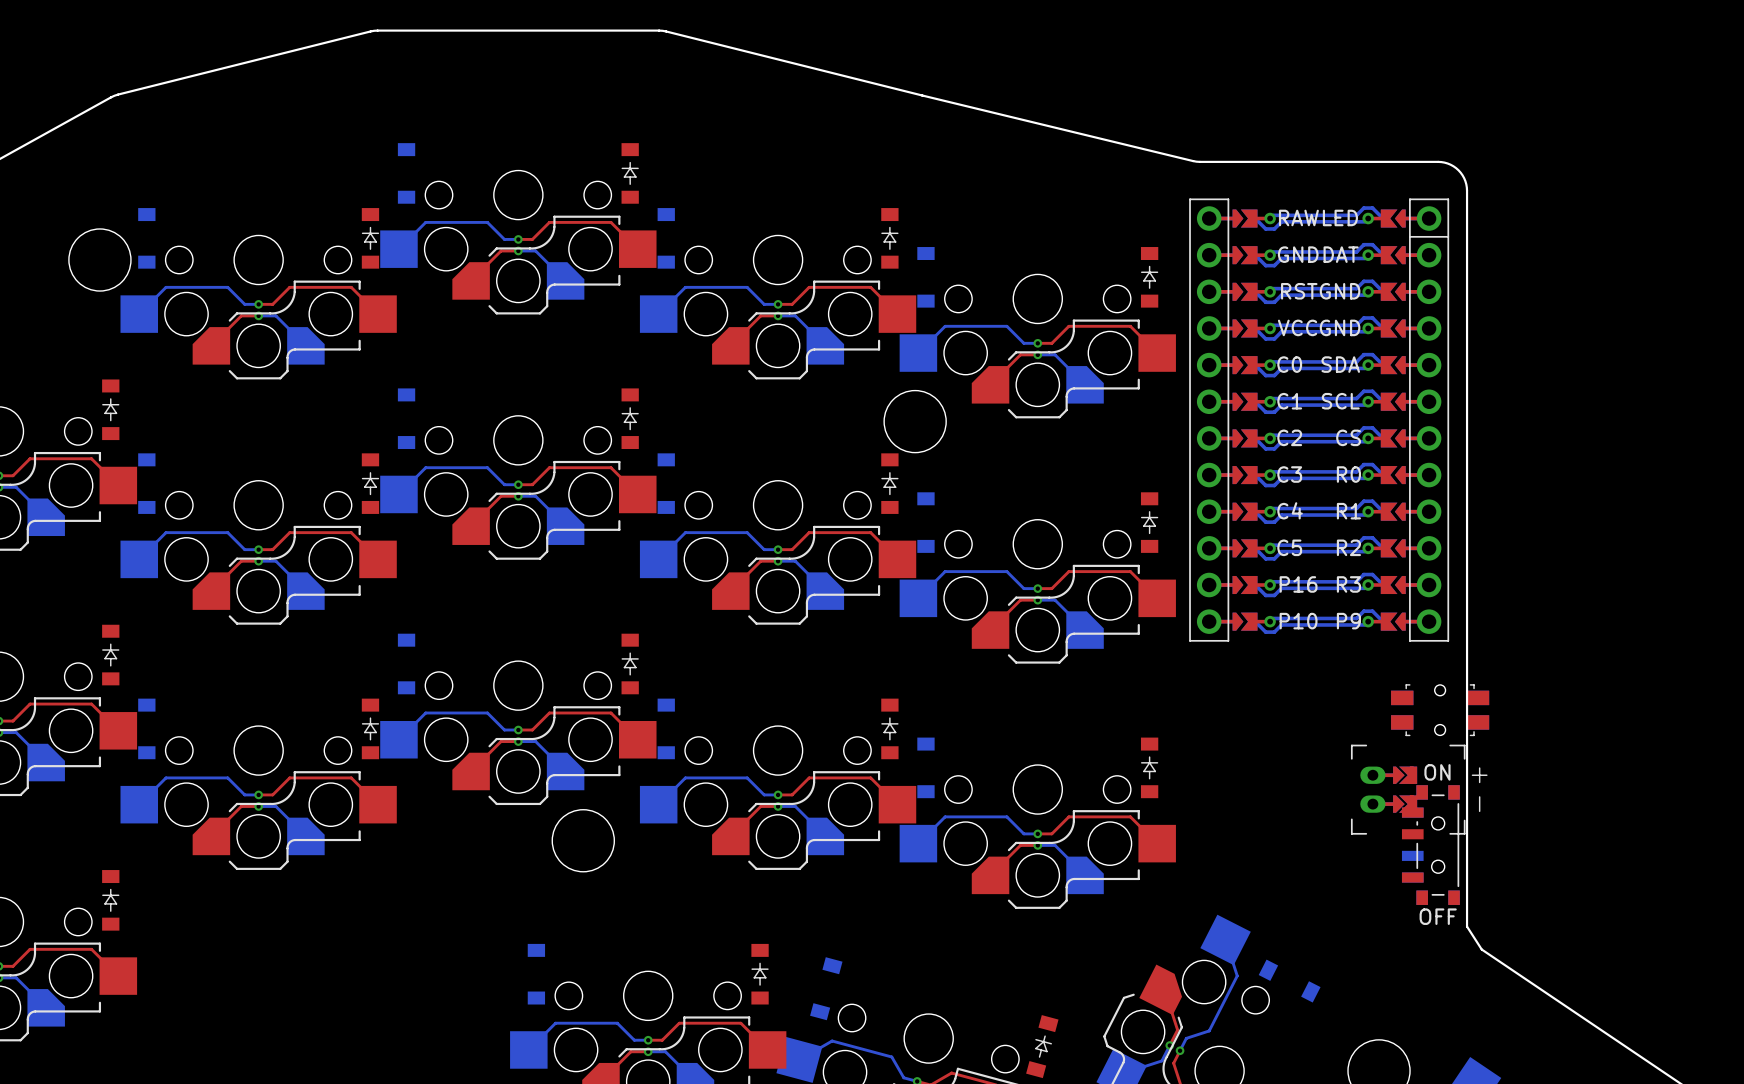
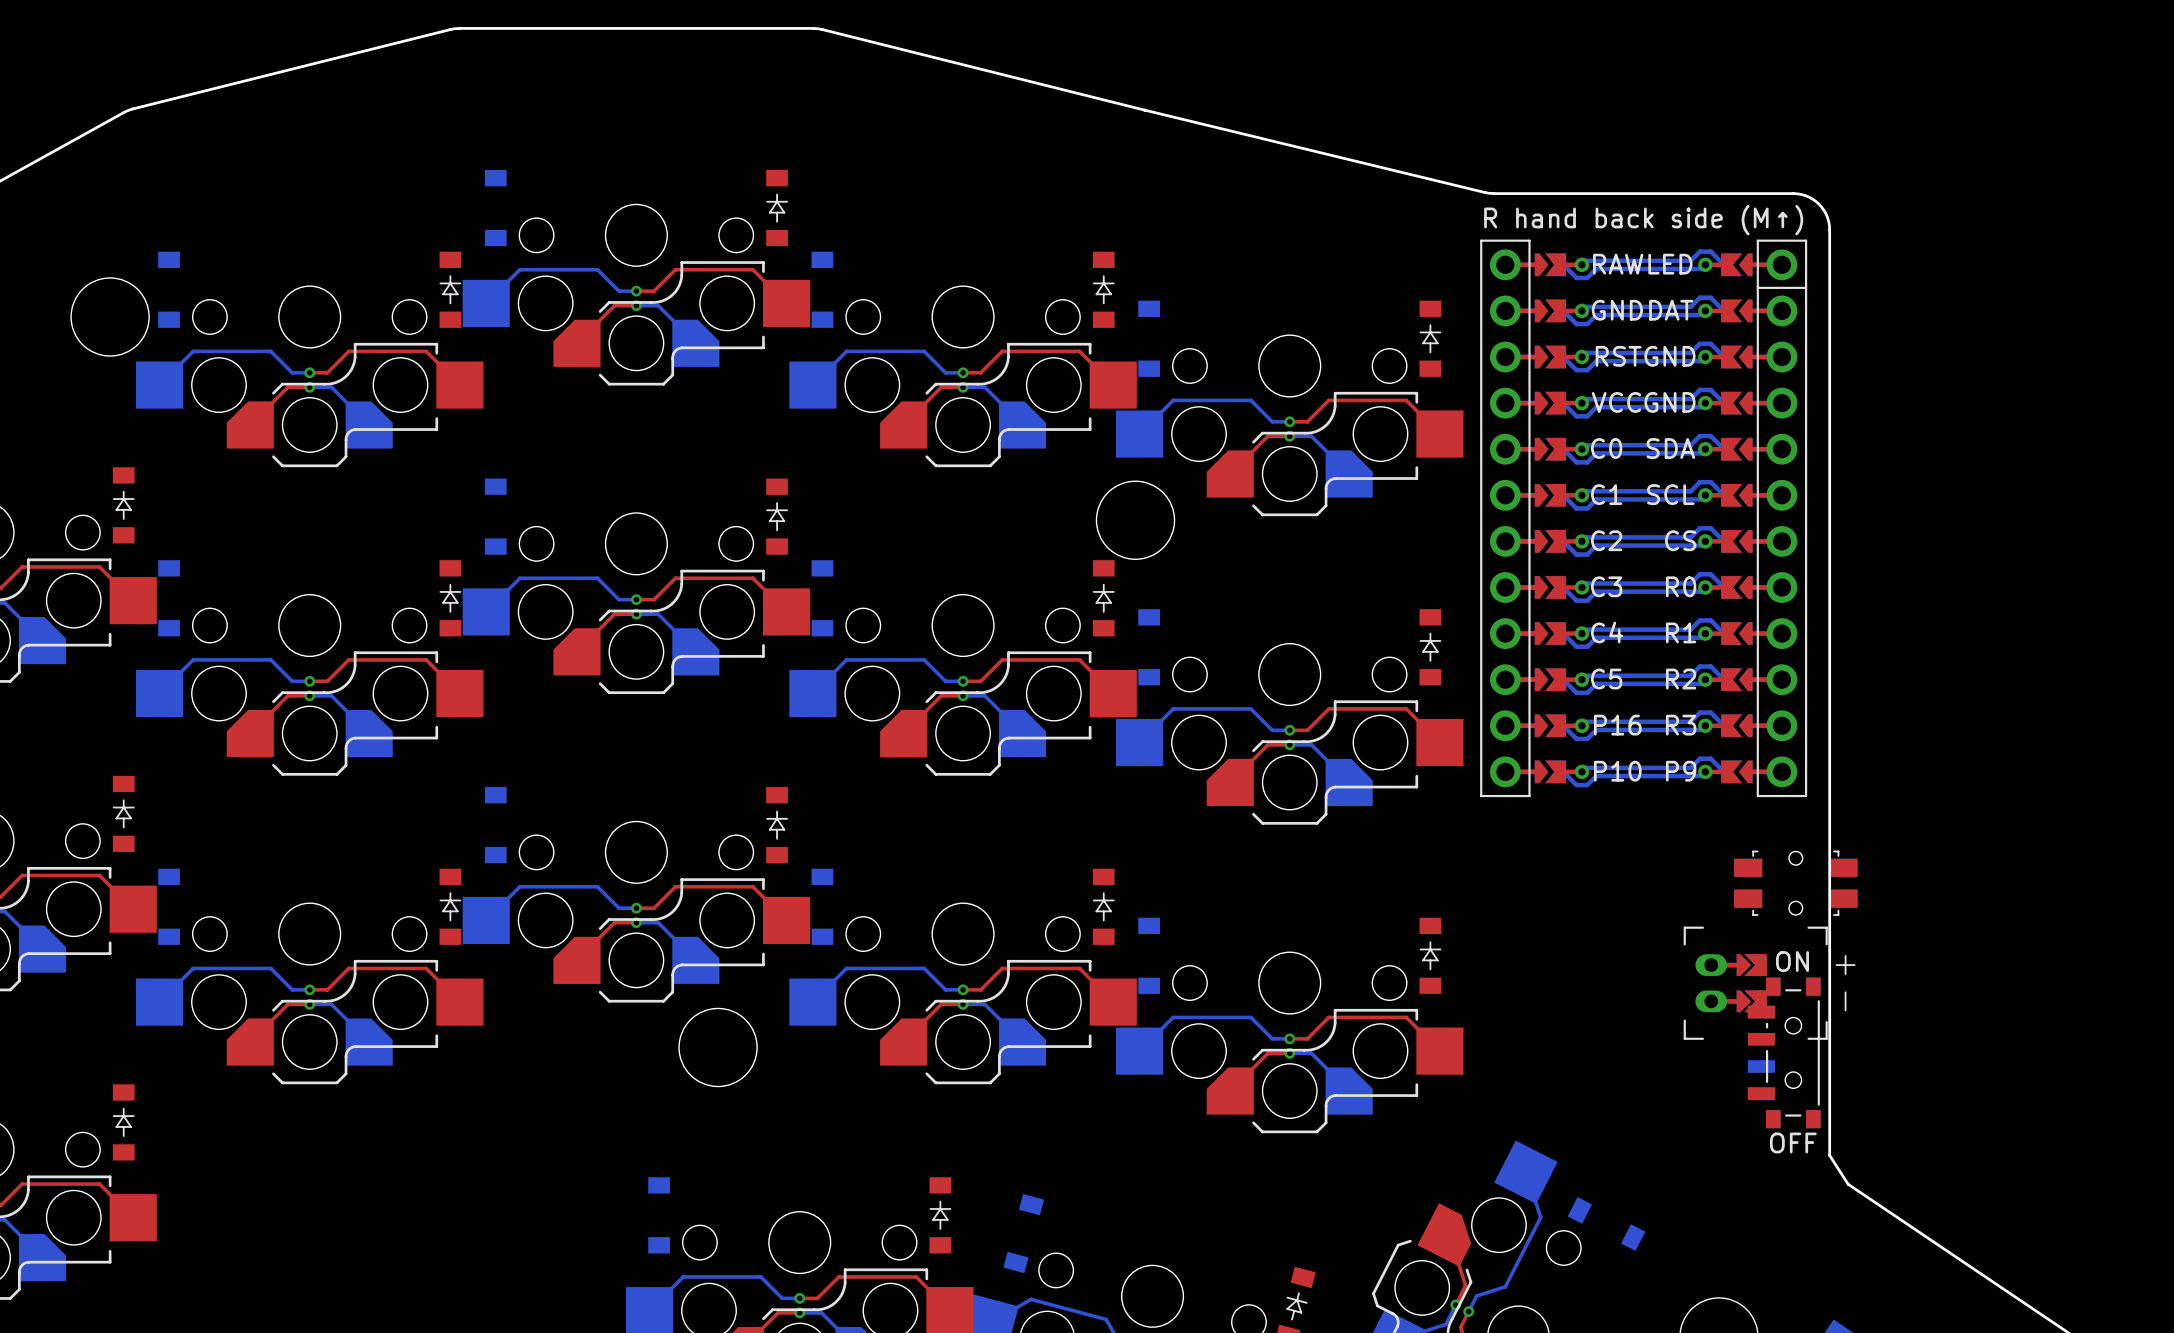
part text: none -> R hand back side (M↑) (1643, 220)

